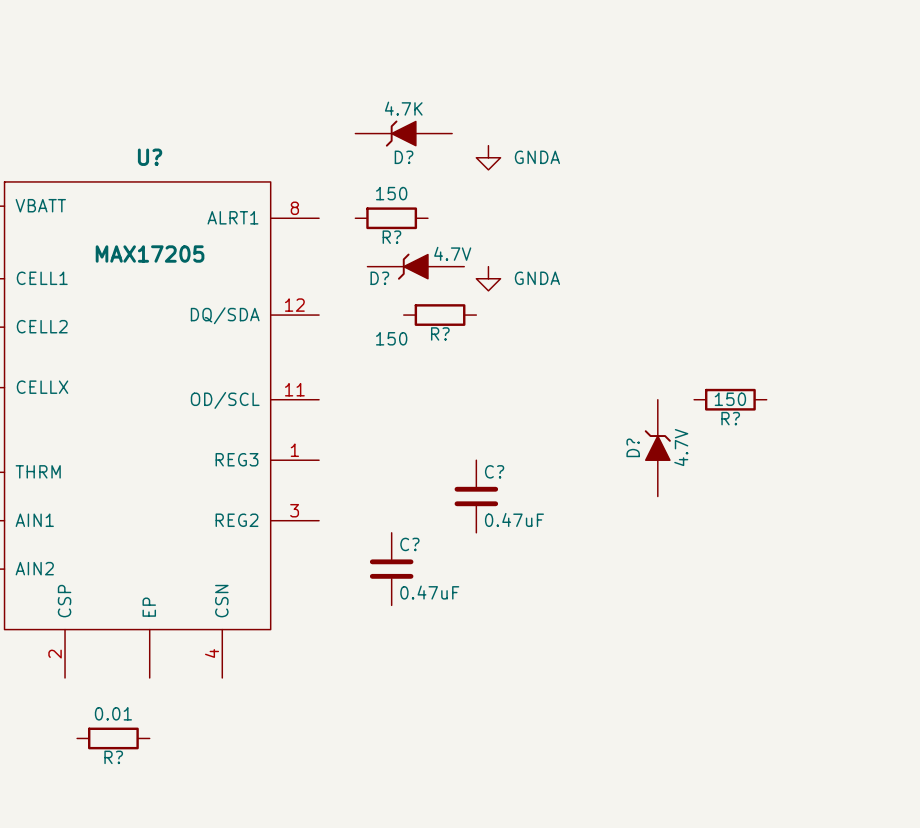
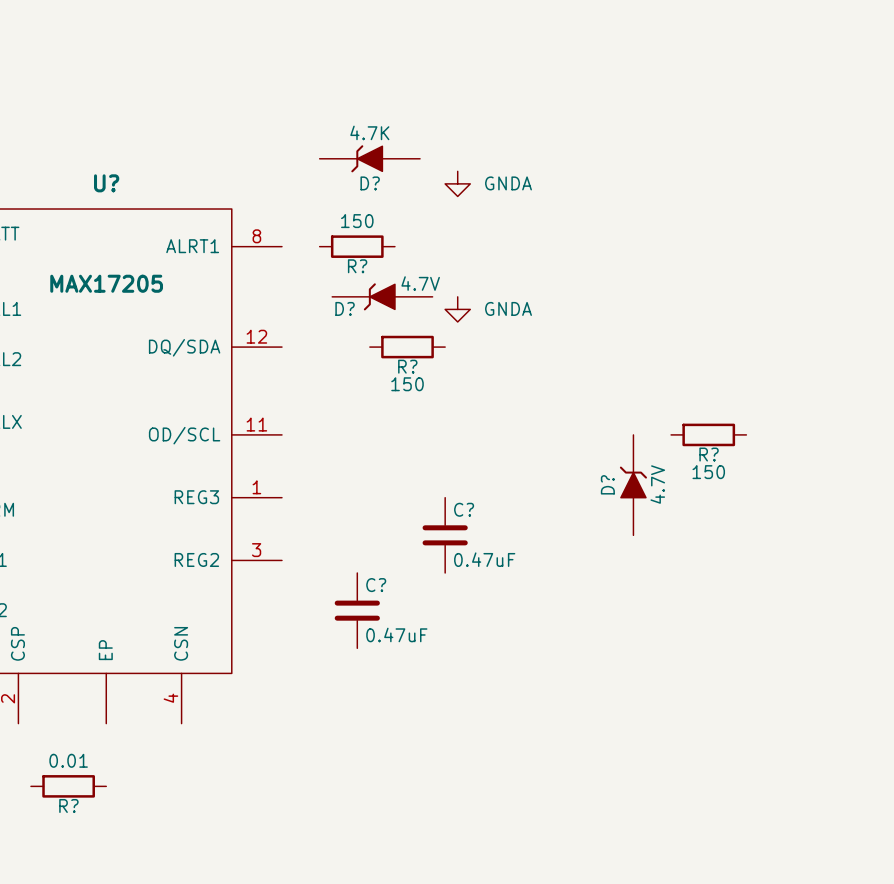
R? value position: 150 (391, 338) -> 150 (407, 384)
R? value position: 150 (730, 399) -> 150 (708, 472)

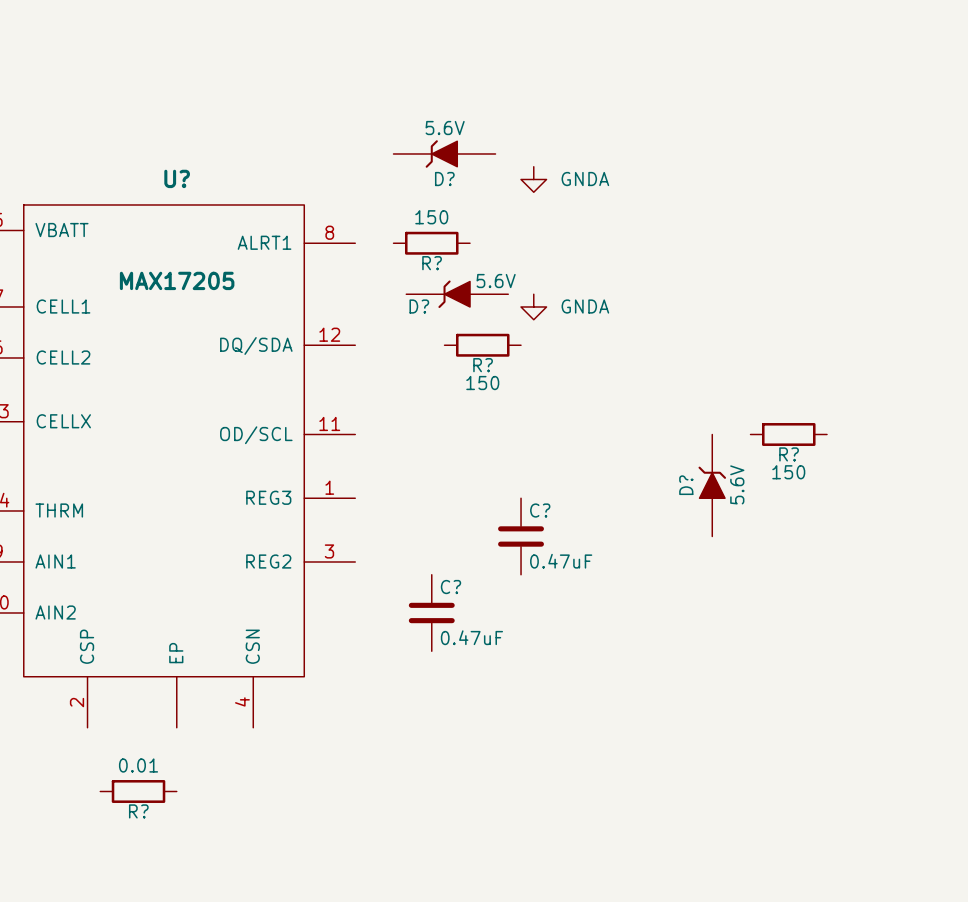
D? value: 4.7K (369, 132) -> 5.6V (445, 128)
D? value: 4.7V (420, 283) -> 5.6V (496, 281)
D? value: 4.7V (657, 484) -> 5.6V (737, 484)

